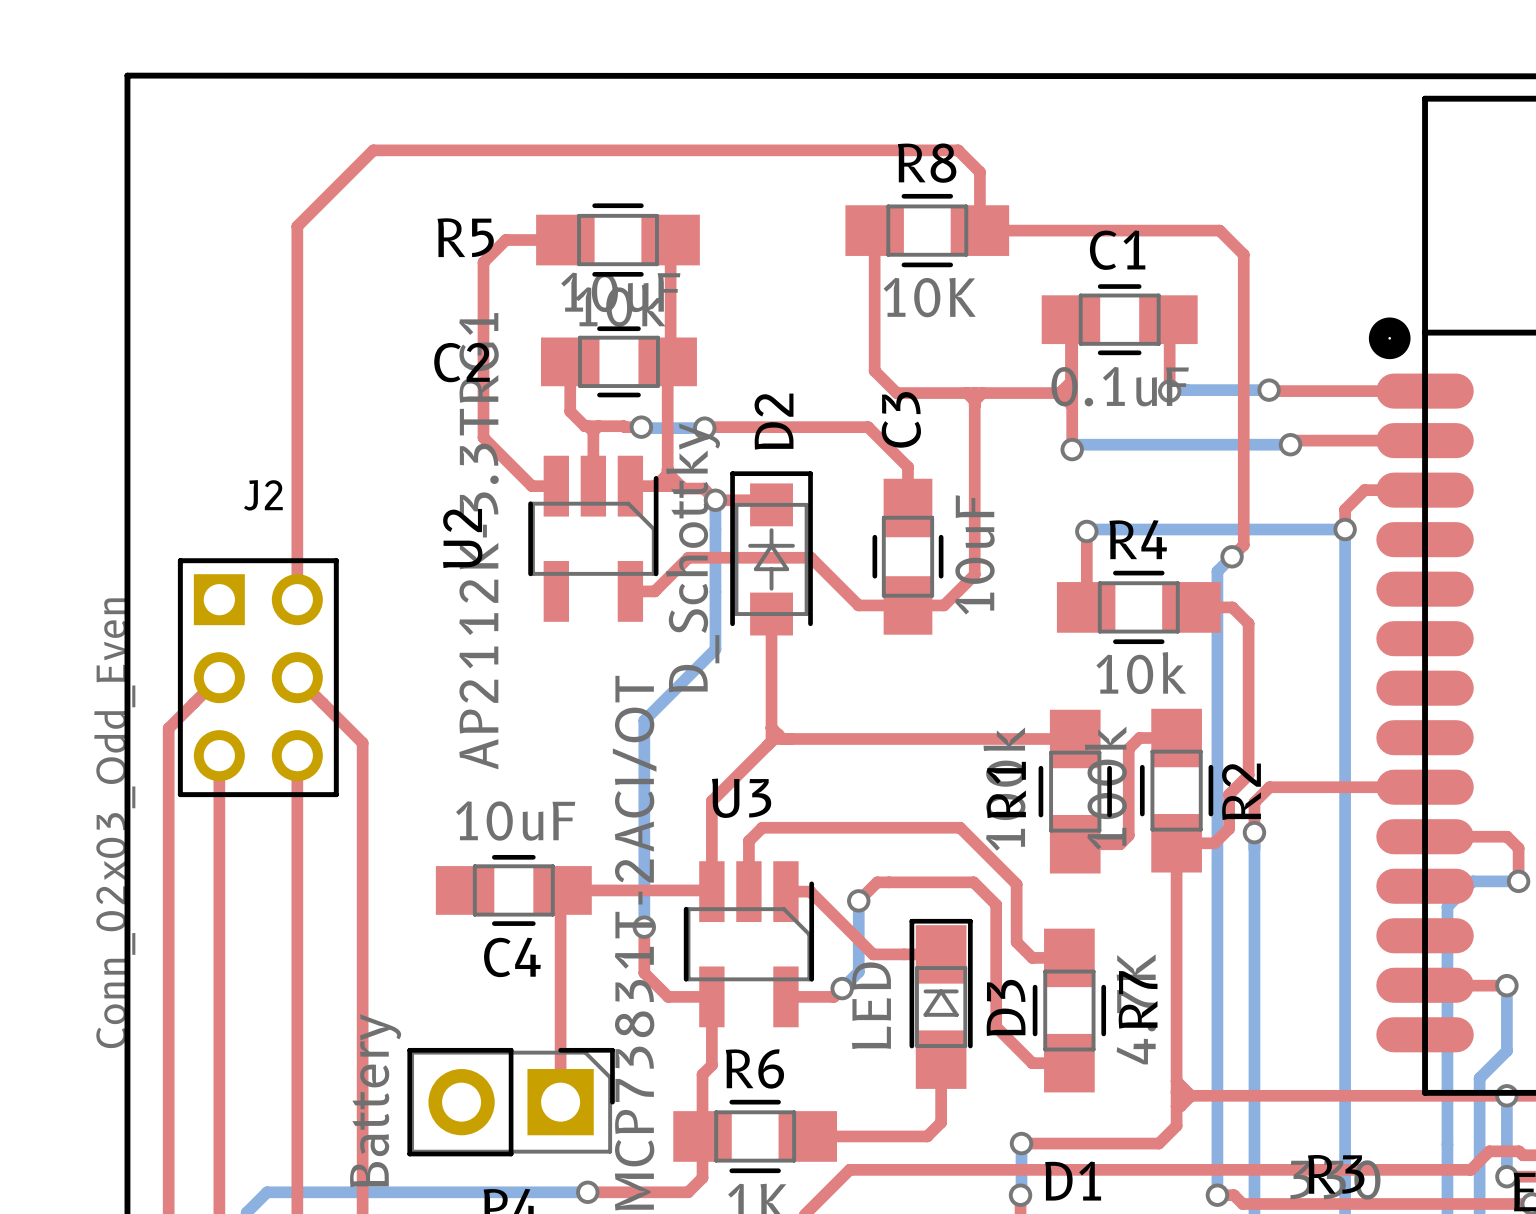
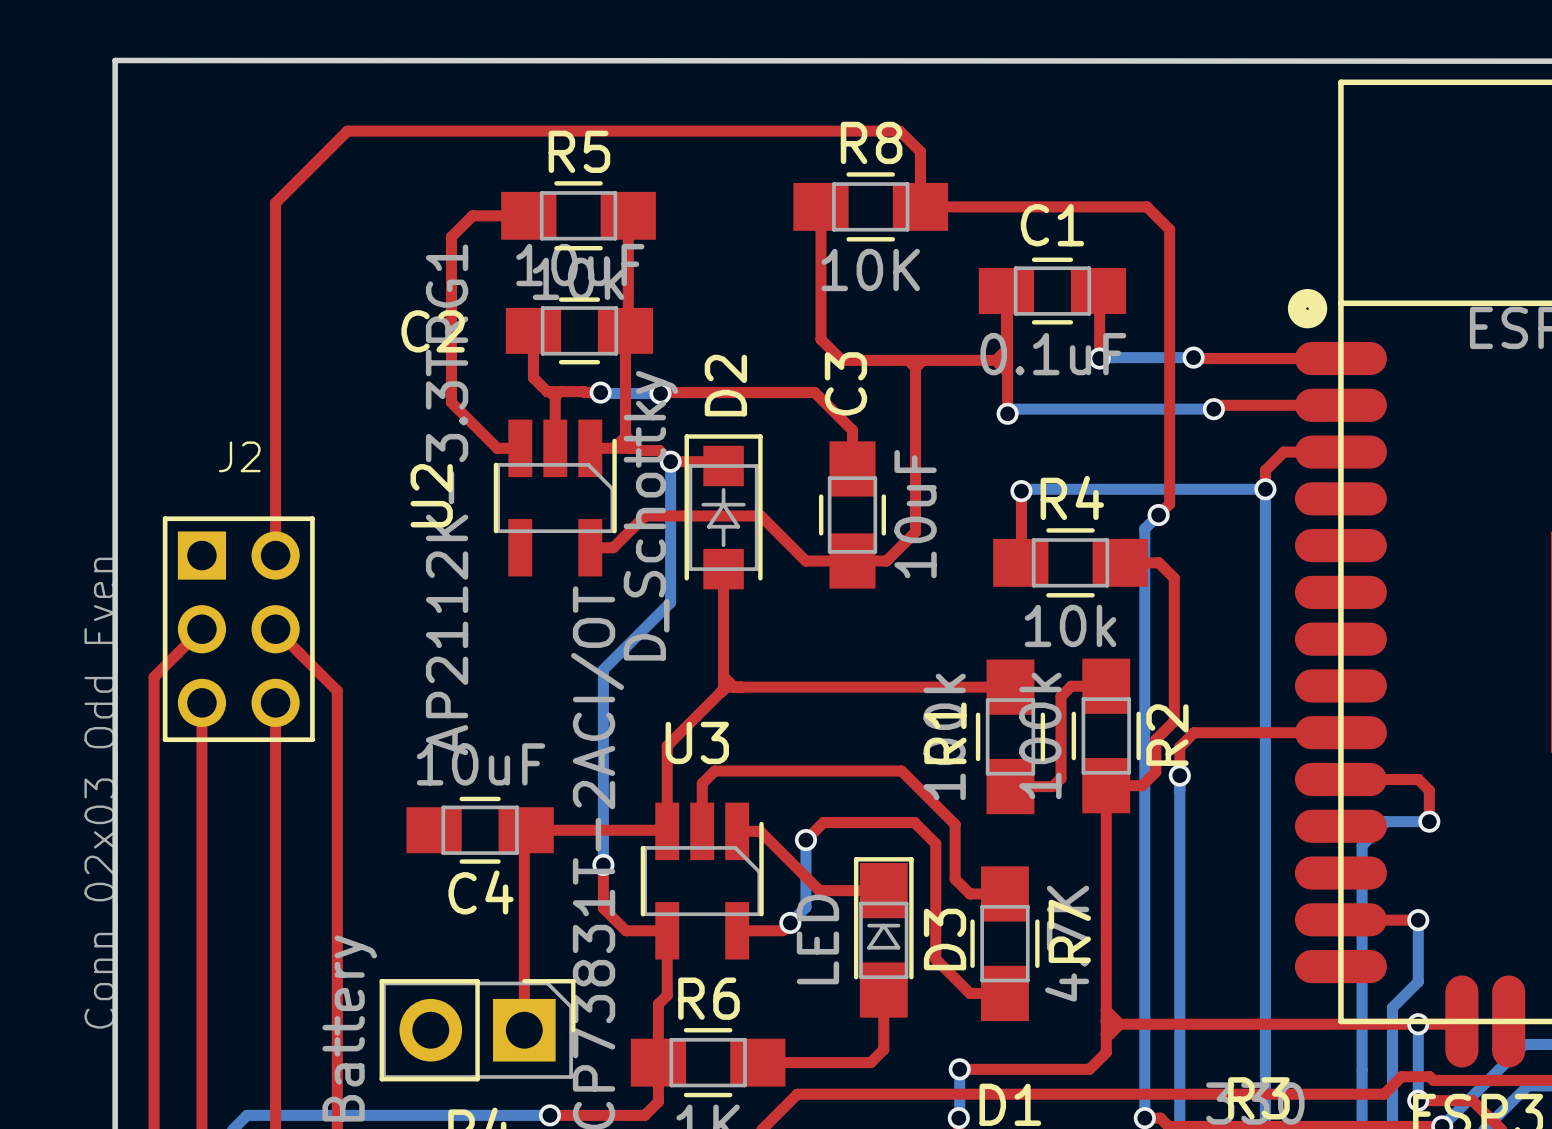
R5 name position: R5 (465, 237) -> R5 (579, 151)

